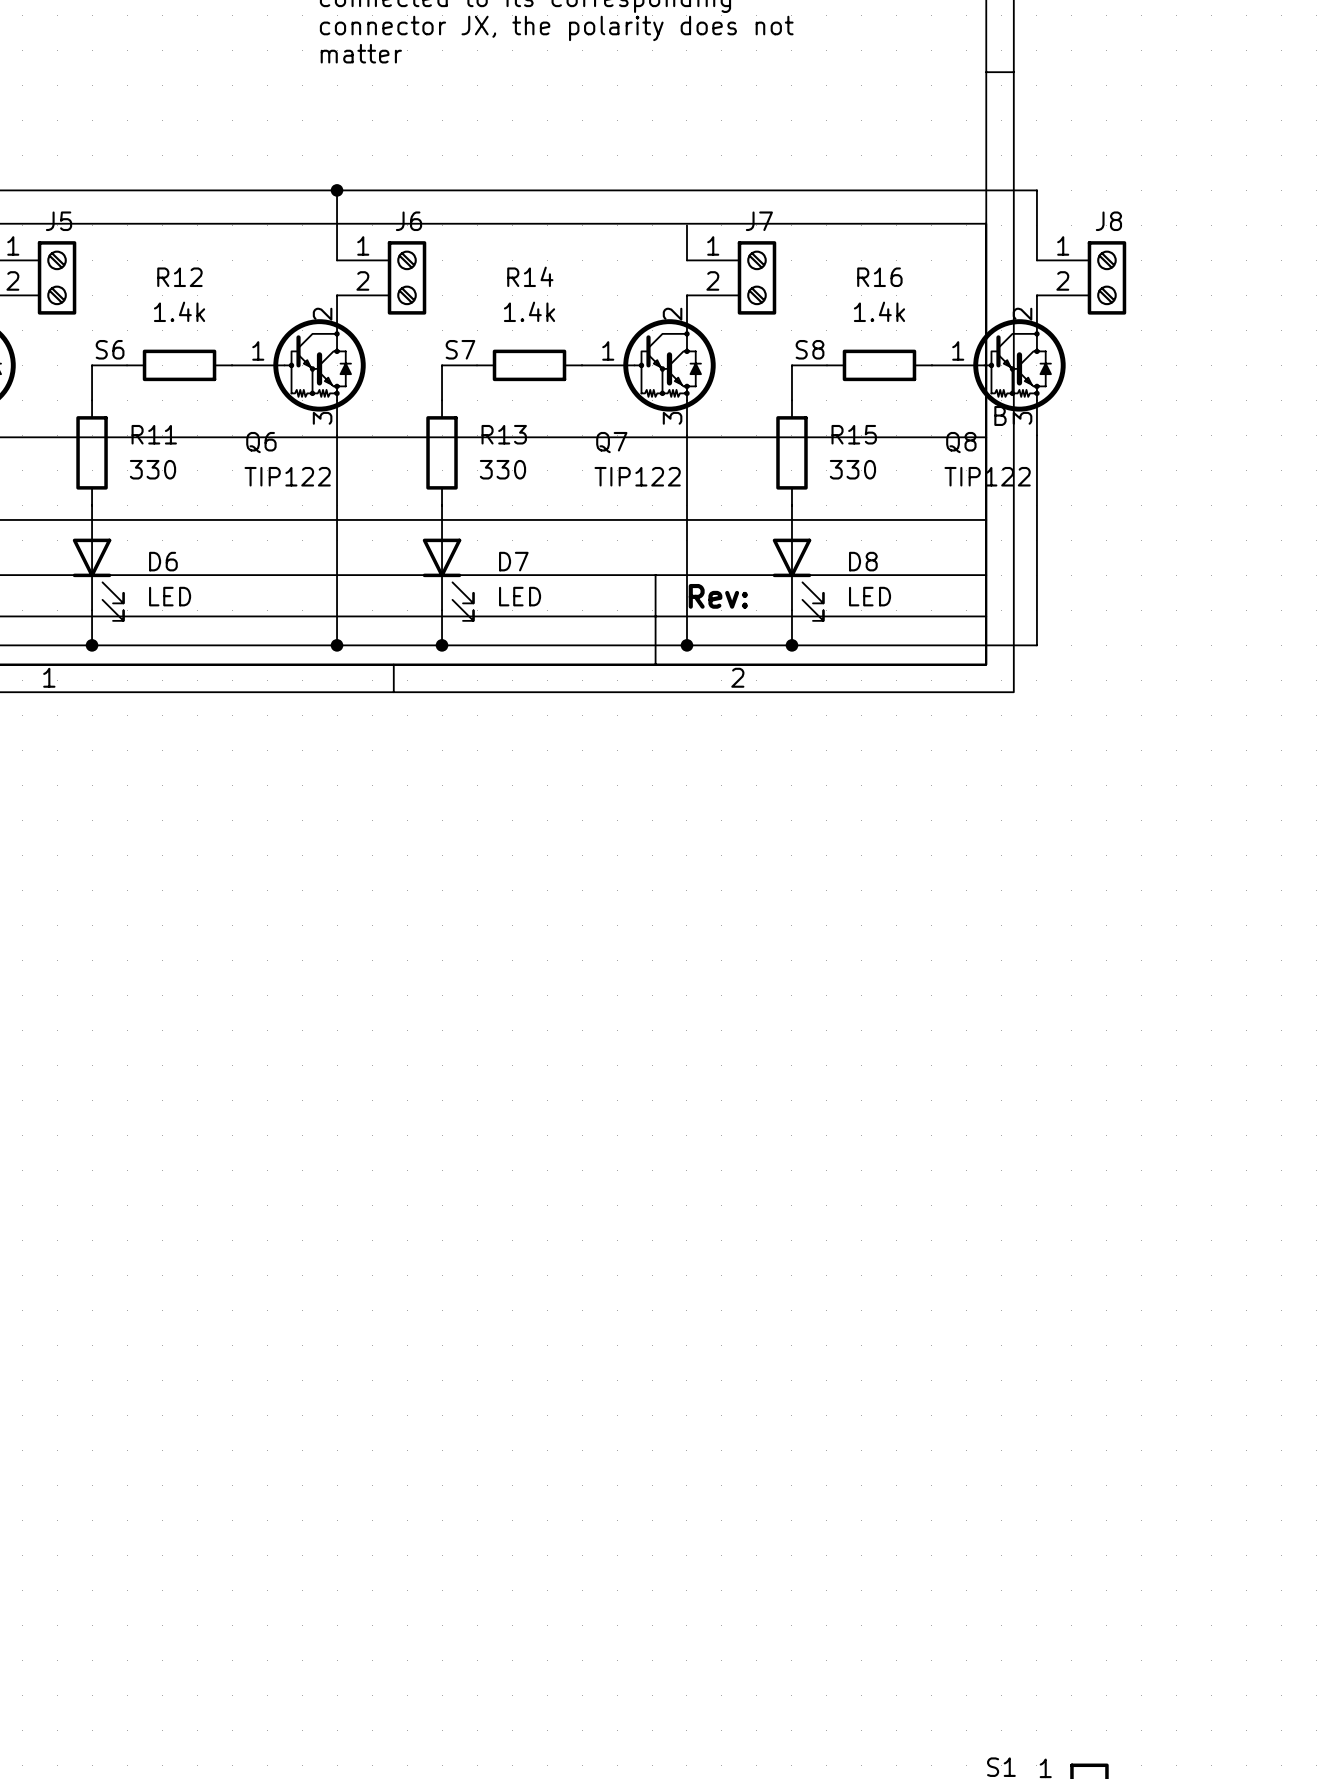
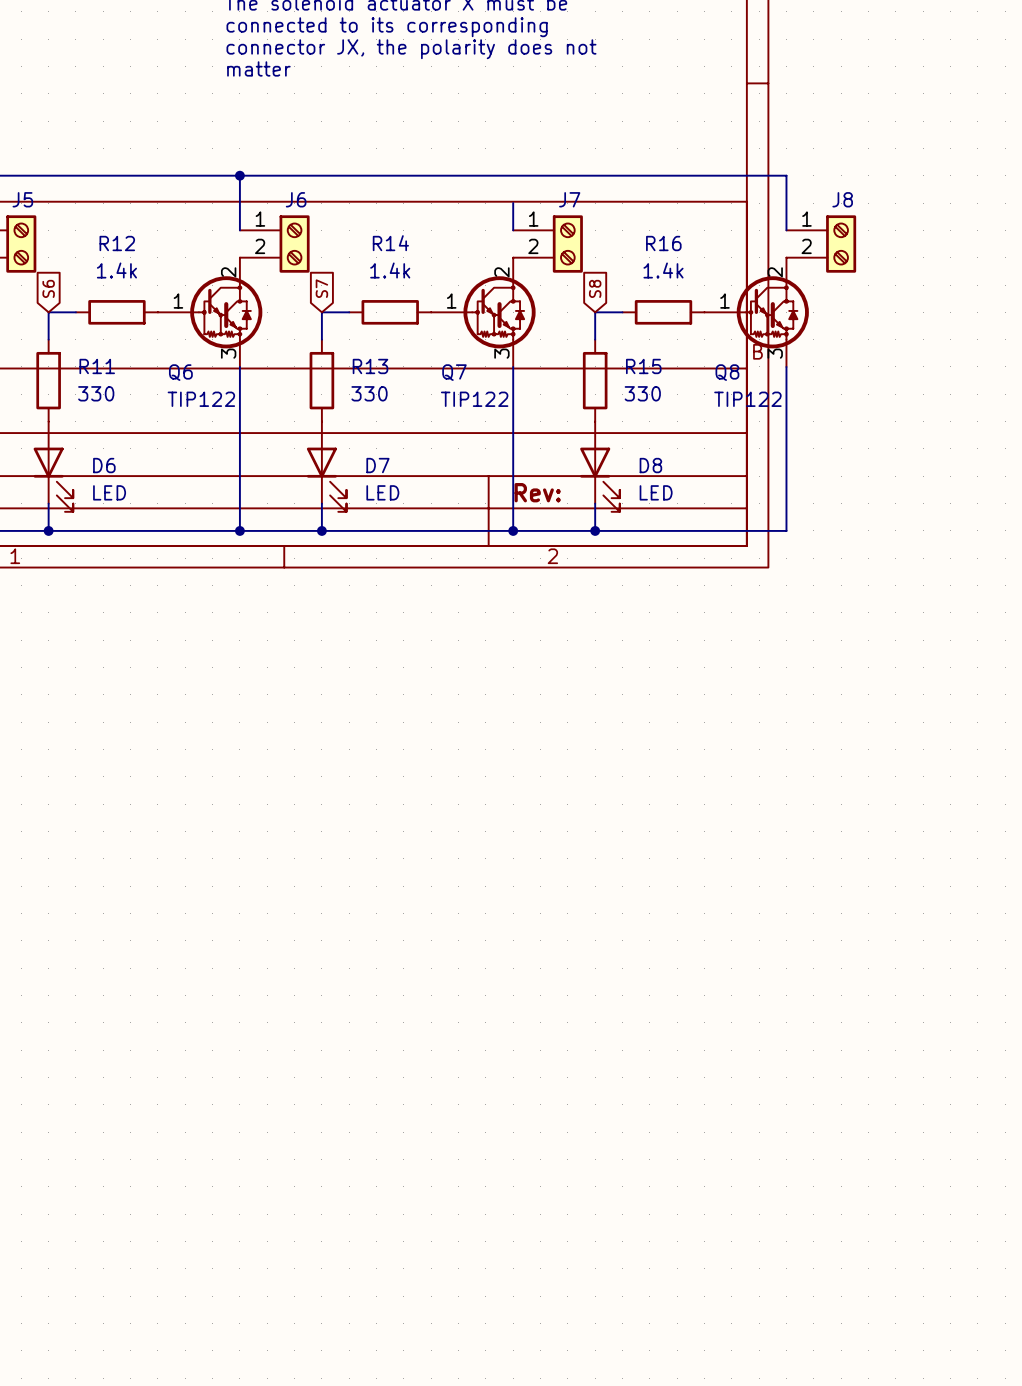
global label: none -> S6 (48, 288)
global label: none -> S7 (321, 288)
global label: none -> S8 (595, 288)
label: S6 (110, 349) -> none
label: S7 (460, 349) -> none
label: S8 (810, 349) -> none

